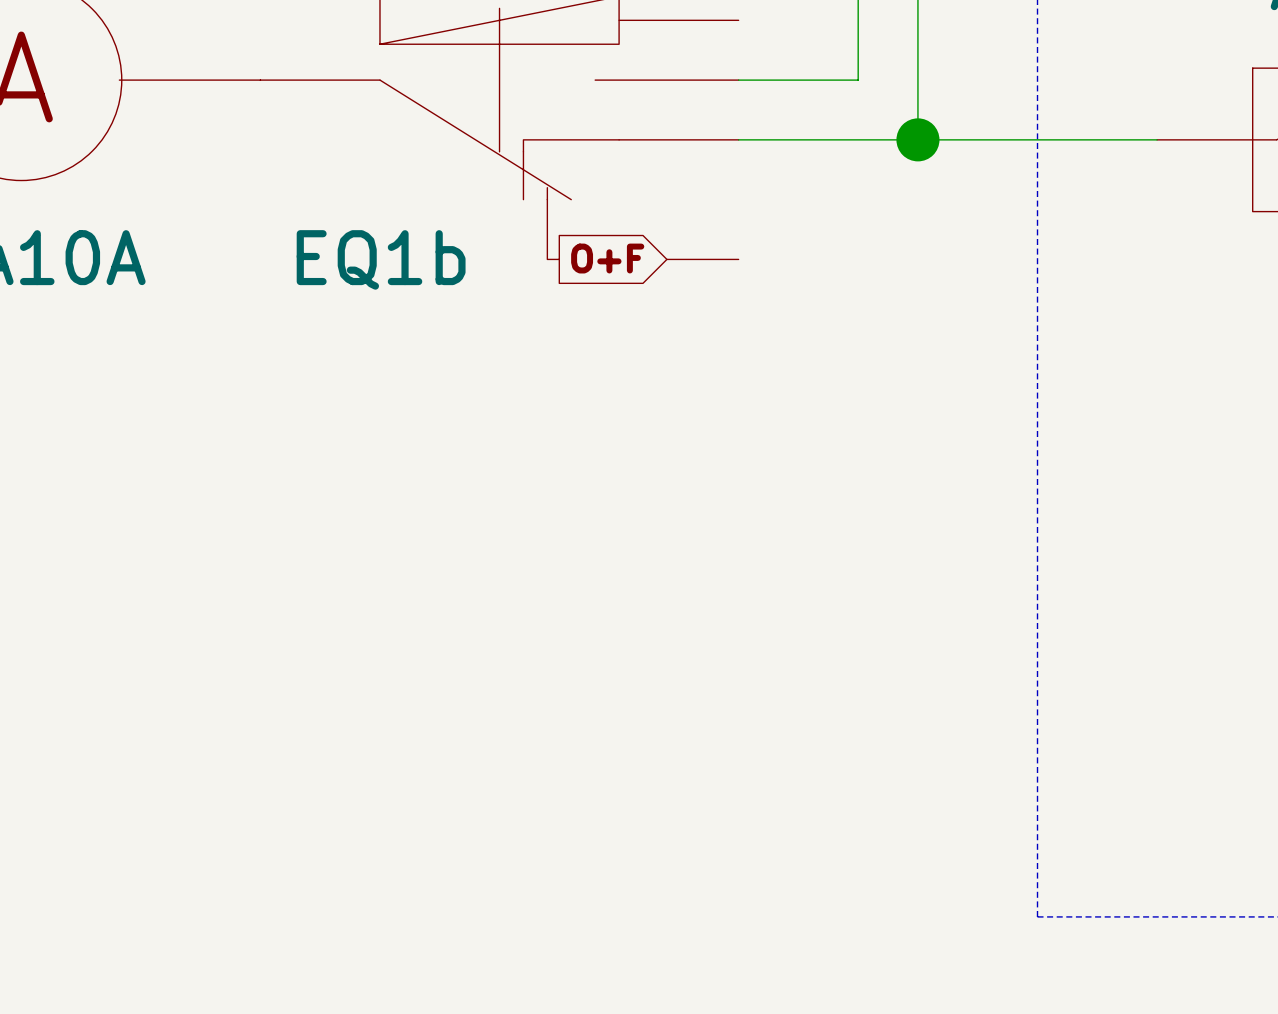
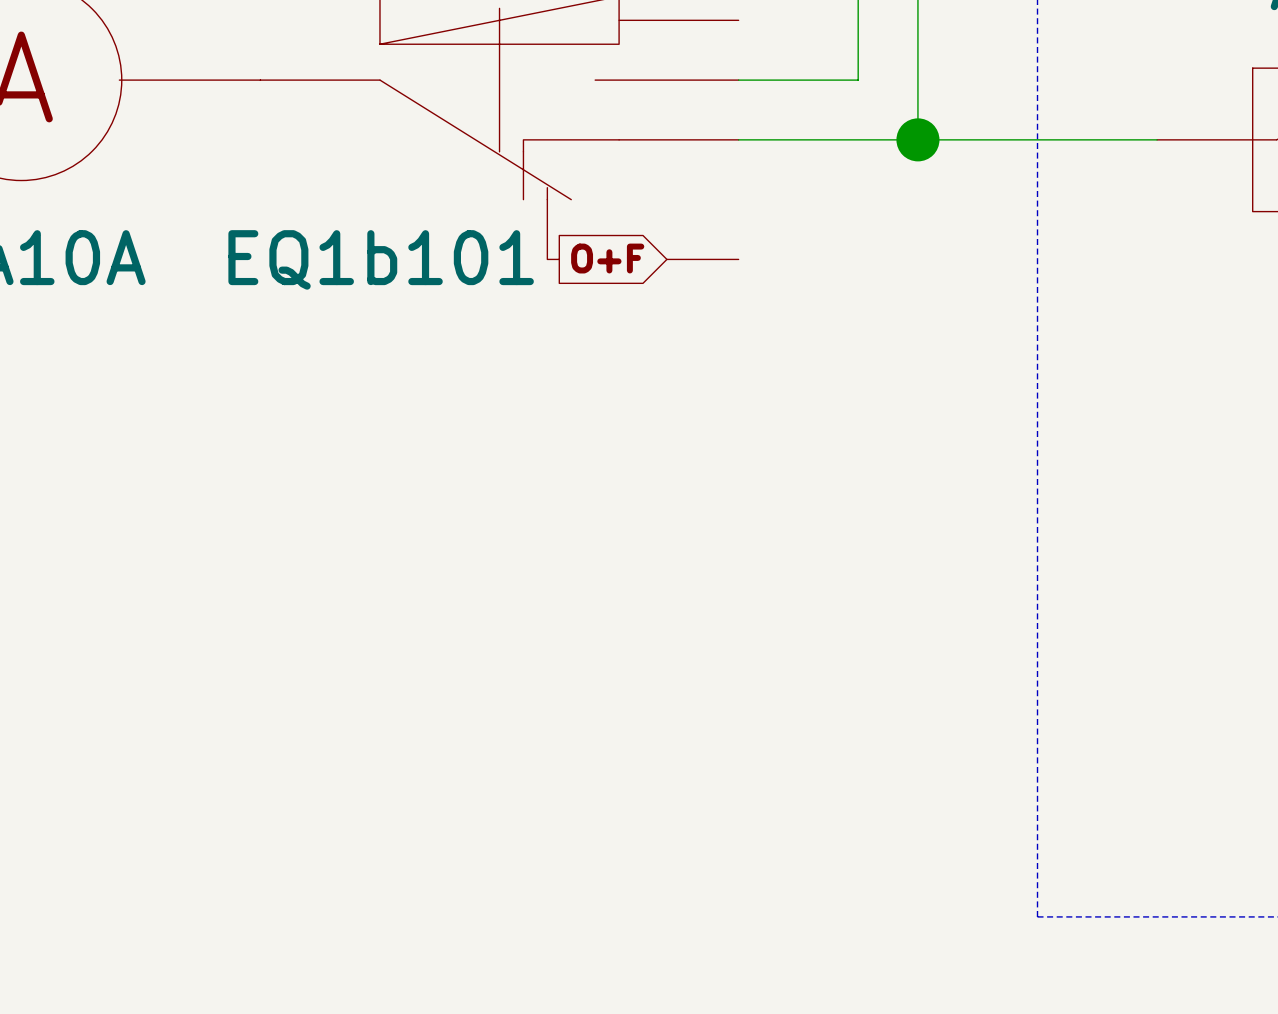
EQ1b name: EQ1b (381, 259) -> EQ1b101 (381, 259)

